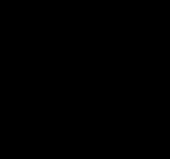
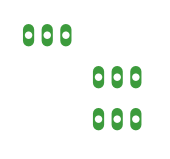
part: none -> (47, 35)
part: none -> (117, 77)
part: none -> (117, 119)

